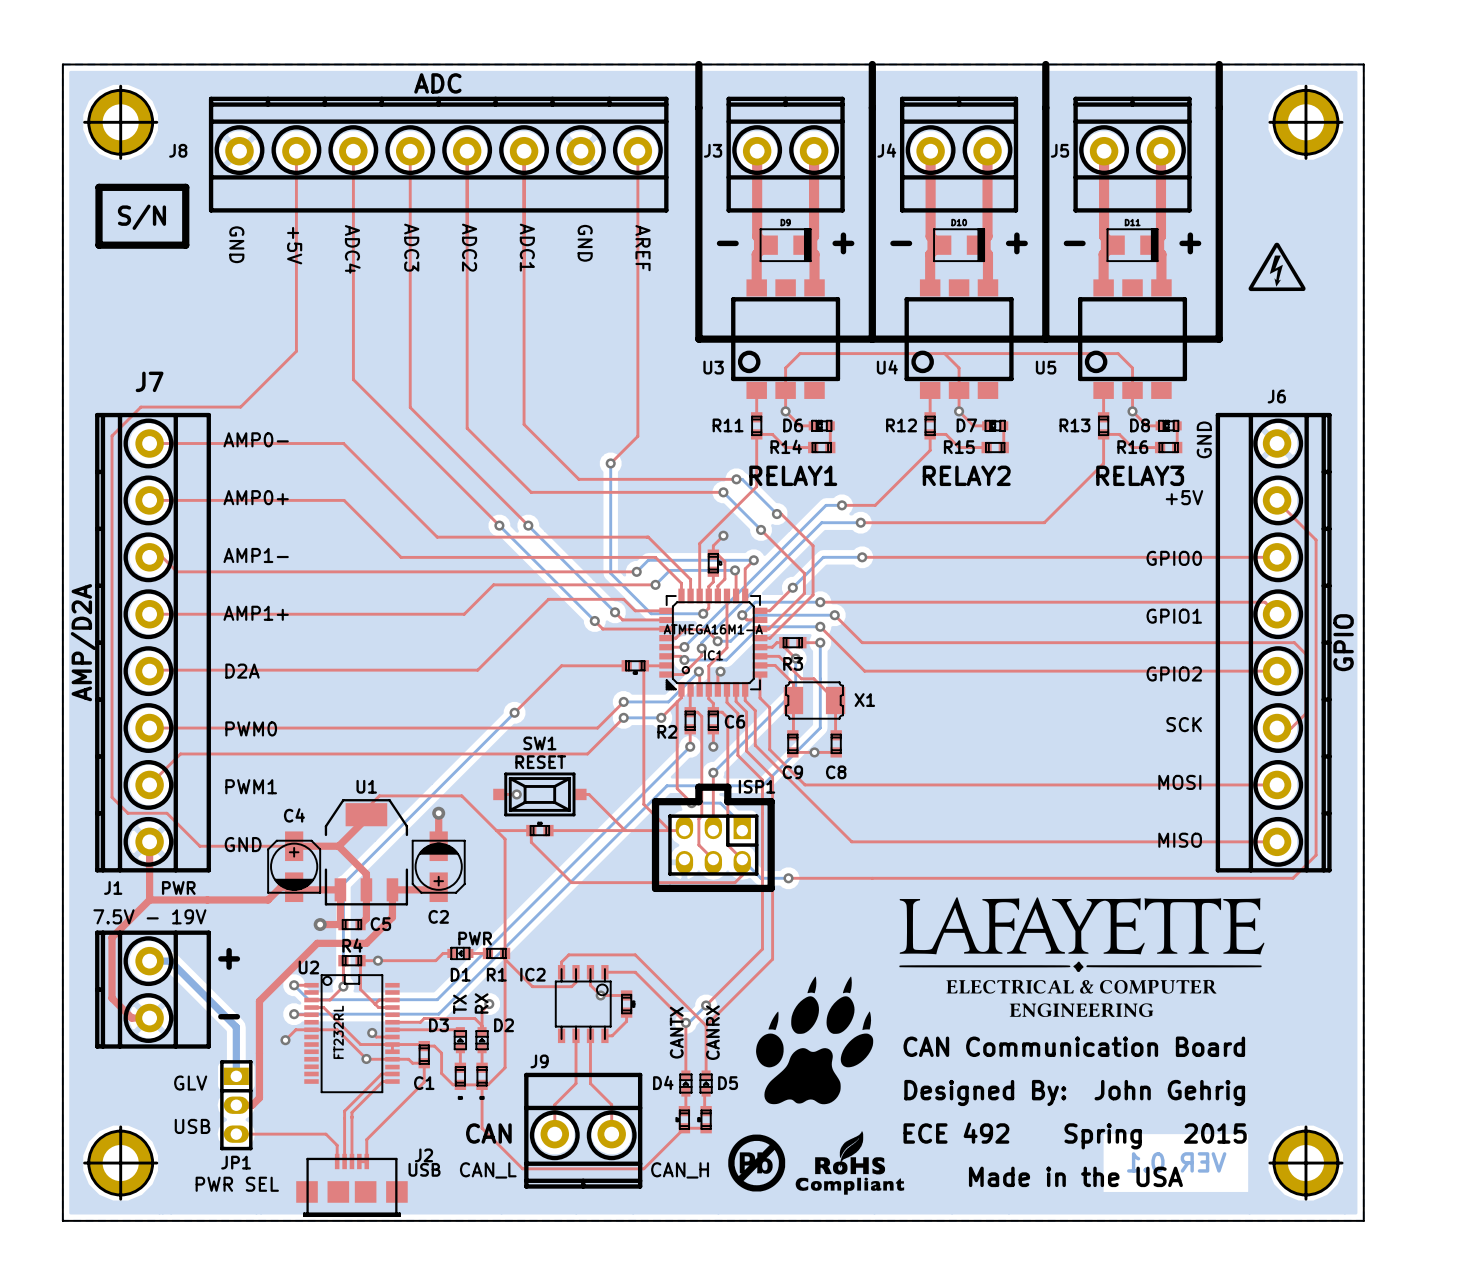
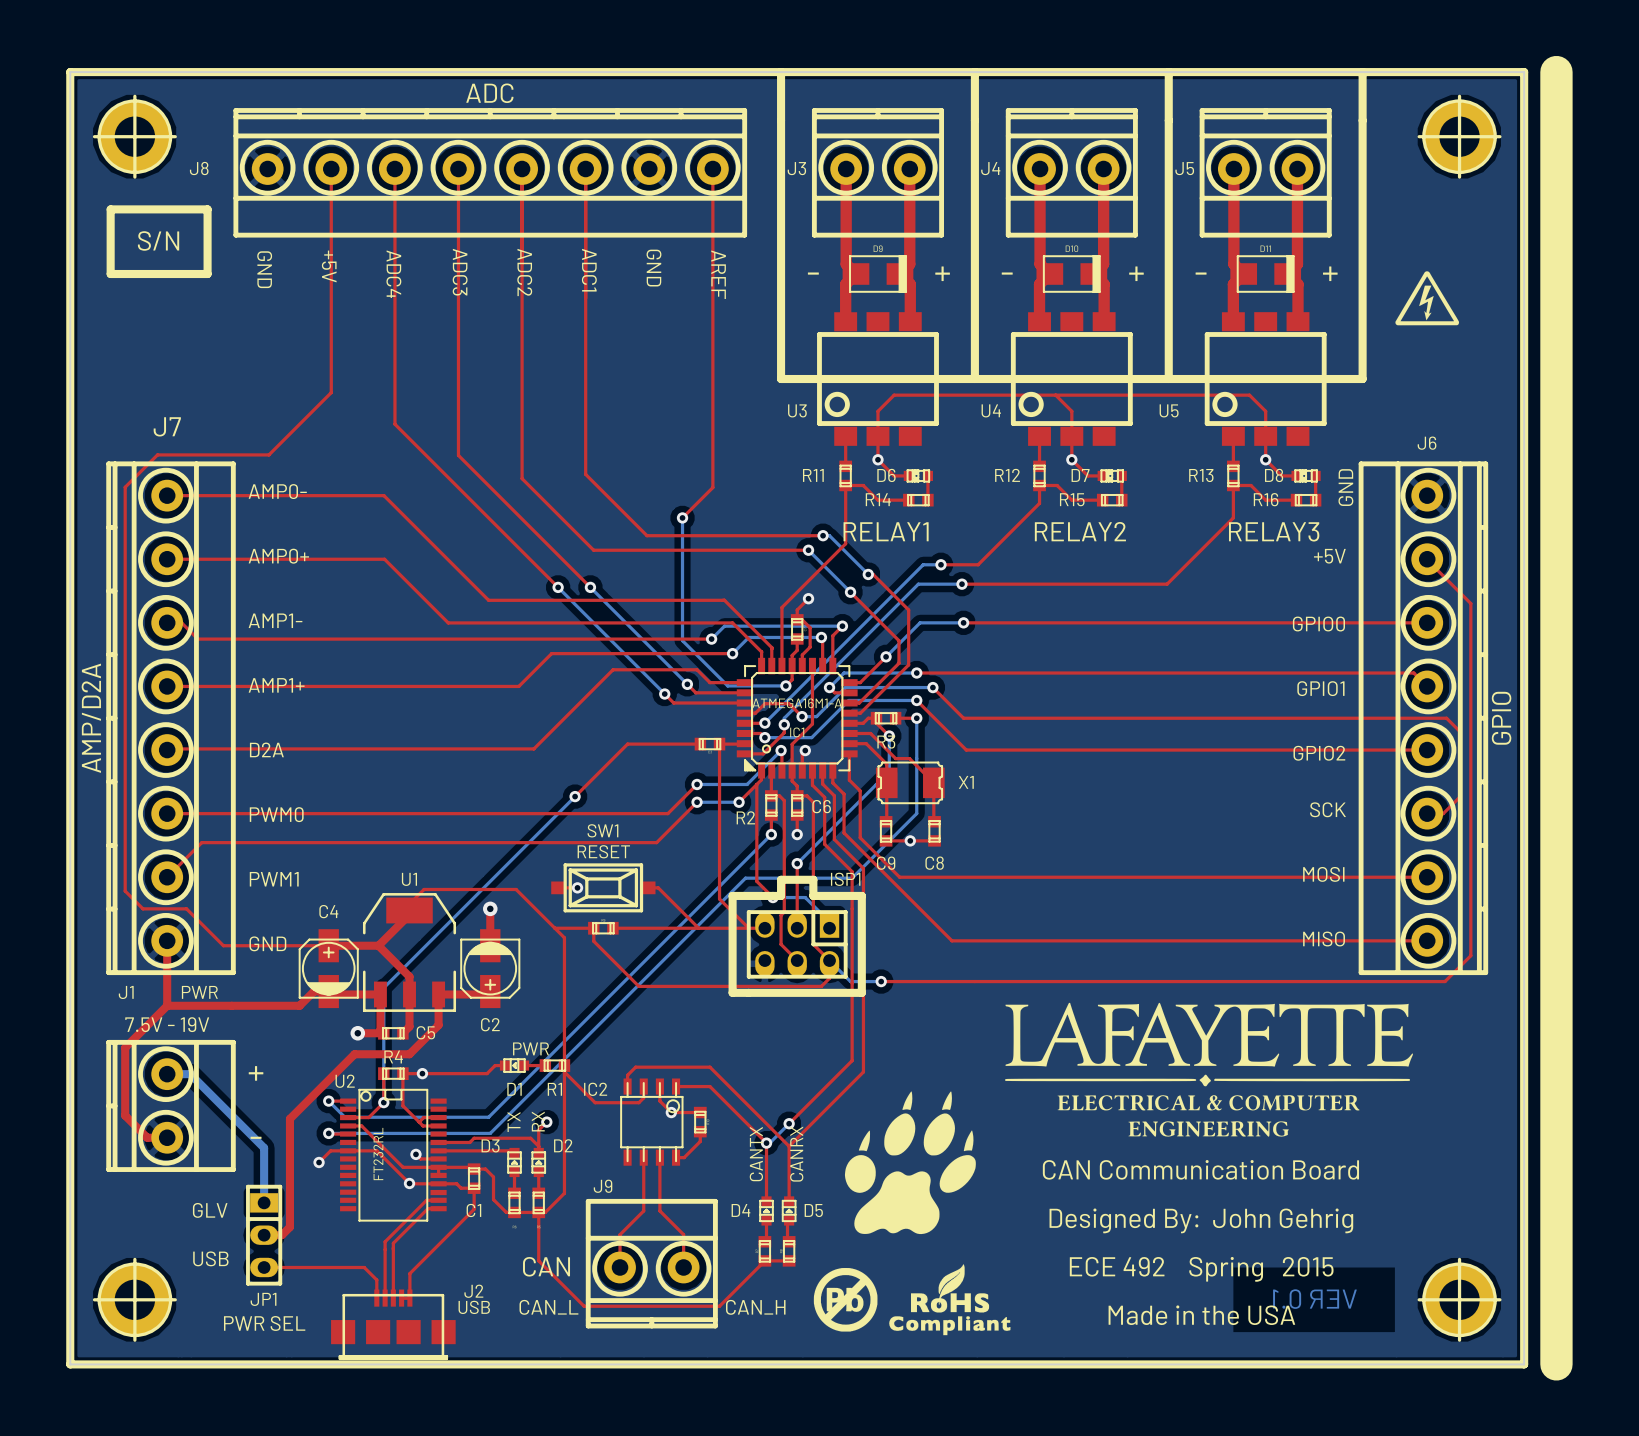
line: none -> (70, 72) (70, 1364) (1524, 1364) (1524, 72) (70, 72)
line: none -> (1556, 72) (1556, 1364)

